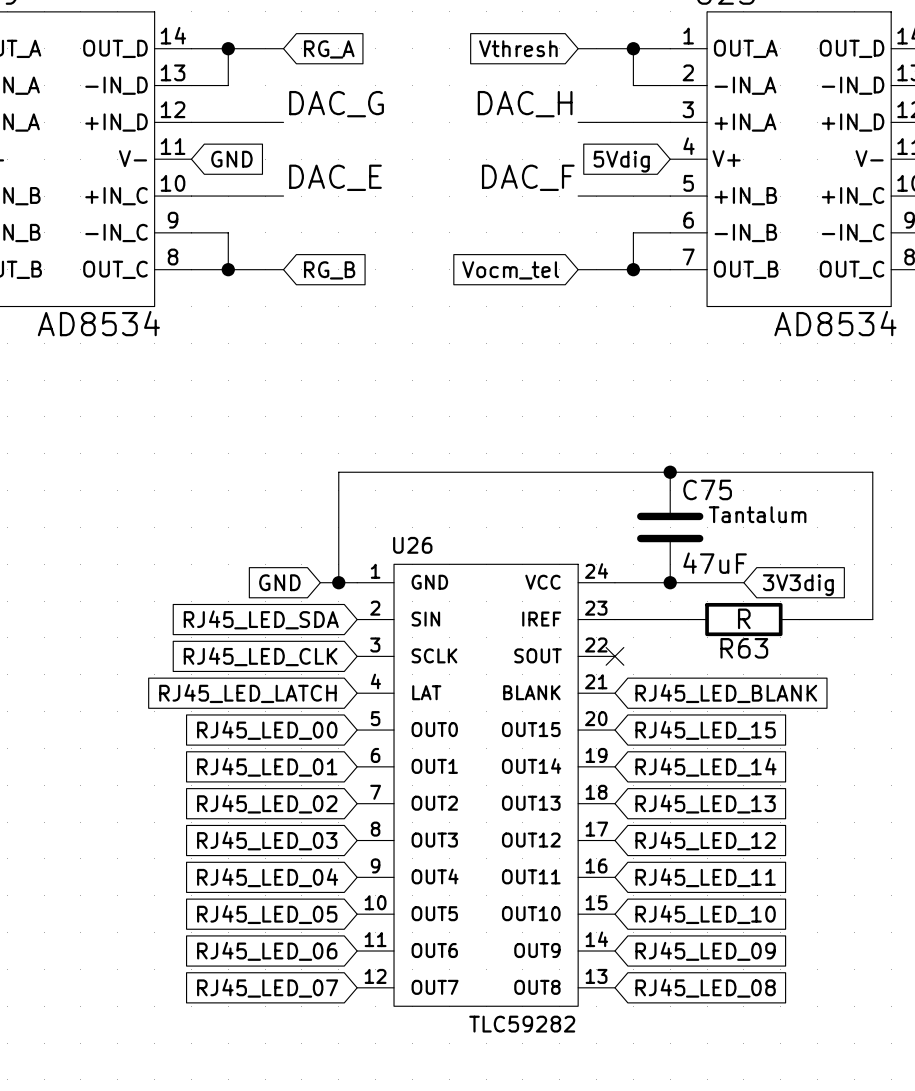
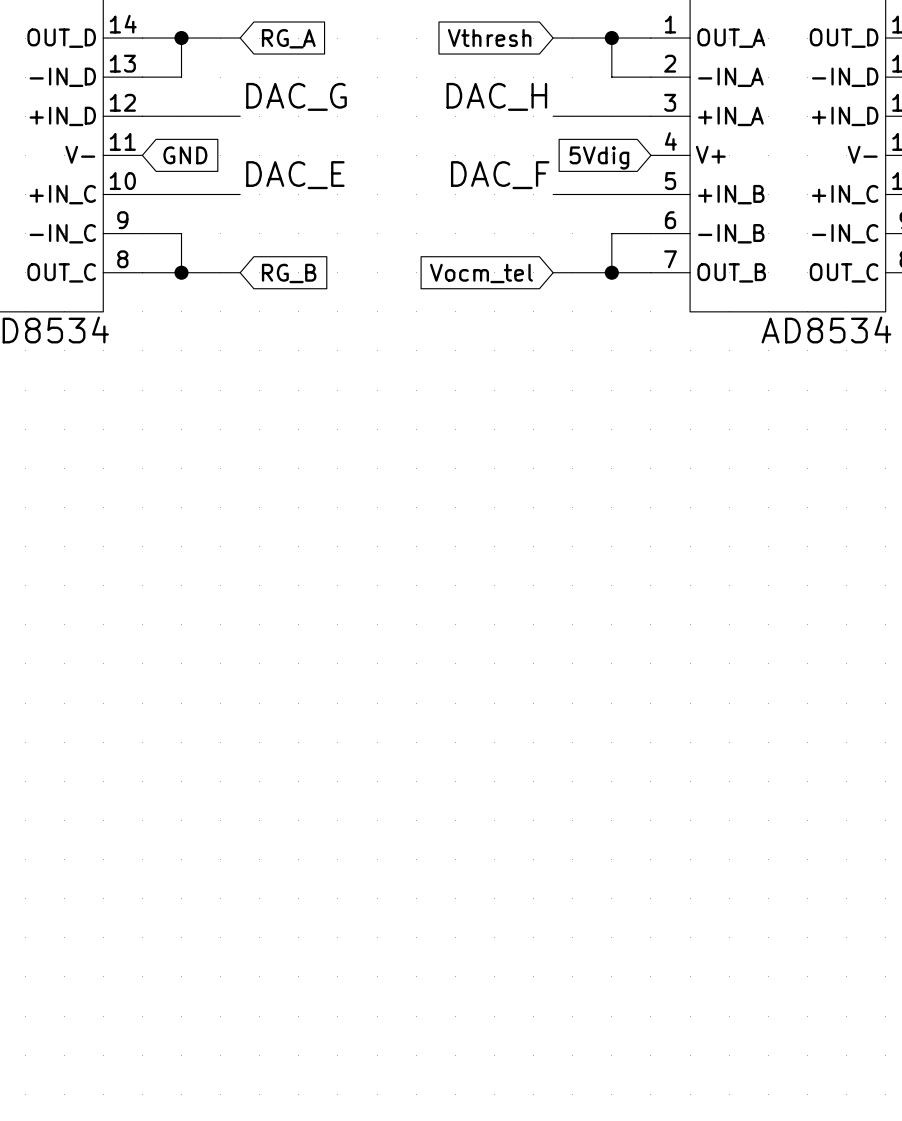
junction: (670, 472) -> none
text: Tantalum (757, 514) -> none
C75: 47uF (670, 527) -> none
global label: GND (279, 582) -> none
wire: (320, 582) (357, 582) -> none
wire: (338, 582) (338, 472) (872, 472) (872, 619) (799, 619) -> none
junction: (338, 582) -> none
wire: (614, 582) (743, 582) -> none
junction: (670, 582) -> none
global label: 3V3dig (798, 585) -> none
global label: RJ45_LED_SDA (261, 619) -> none
wire: (614, 619) (688, 619) -> none
R63: R (743, 619) -> none
global label: RJ45_LED_CLK (260, 656) -> none
no-connect mark: (614, 656) -> none
global label: RJ45_LED_LATCH (247, 693) -> none
global label: RJ45_LED_BLANK (726, 693) -> none
global label: RJ45_LED_00 (267, 730) -> none
global label: RJ45_LED_15 (705, 730) -> none
global label: RJ45_LED_01 (267, 767) -> none
global label: RJ45_LED_14 (705, 767) -> none
U26: TLC59282 (486, 785) -> none
global label: RJ45_LED_02 (267, 804) -> none
global label: RJ45_LED_13 (705, 804) -> none
global label: RJ45_LED_03 (267, 840) -> none
global label: RJ45_LED_12 (705, 840) -> none
global label: RJ45_LED_04 (267, 877) -> none
global label: RJ45_LED_11 (705, 877) -> none
global label: RJ45_LED_05 (267, 914) -> none
global label: RJ45_LED_10 (705, 914) -> none
global label: RJ45_LED_06 (267, 951) -> none
global label: RJ45_LED_09 (705, 951) -> none
global label: RJ45_LED_07 (267, 988) -> none
global label: RJ45_LED_08 (705, 988) -> none

